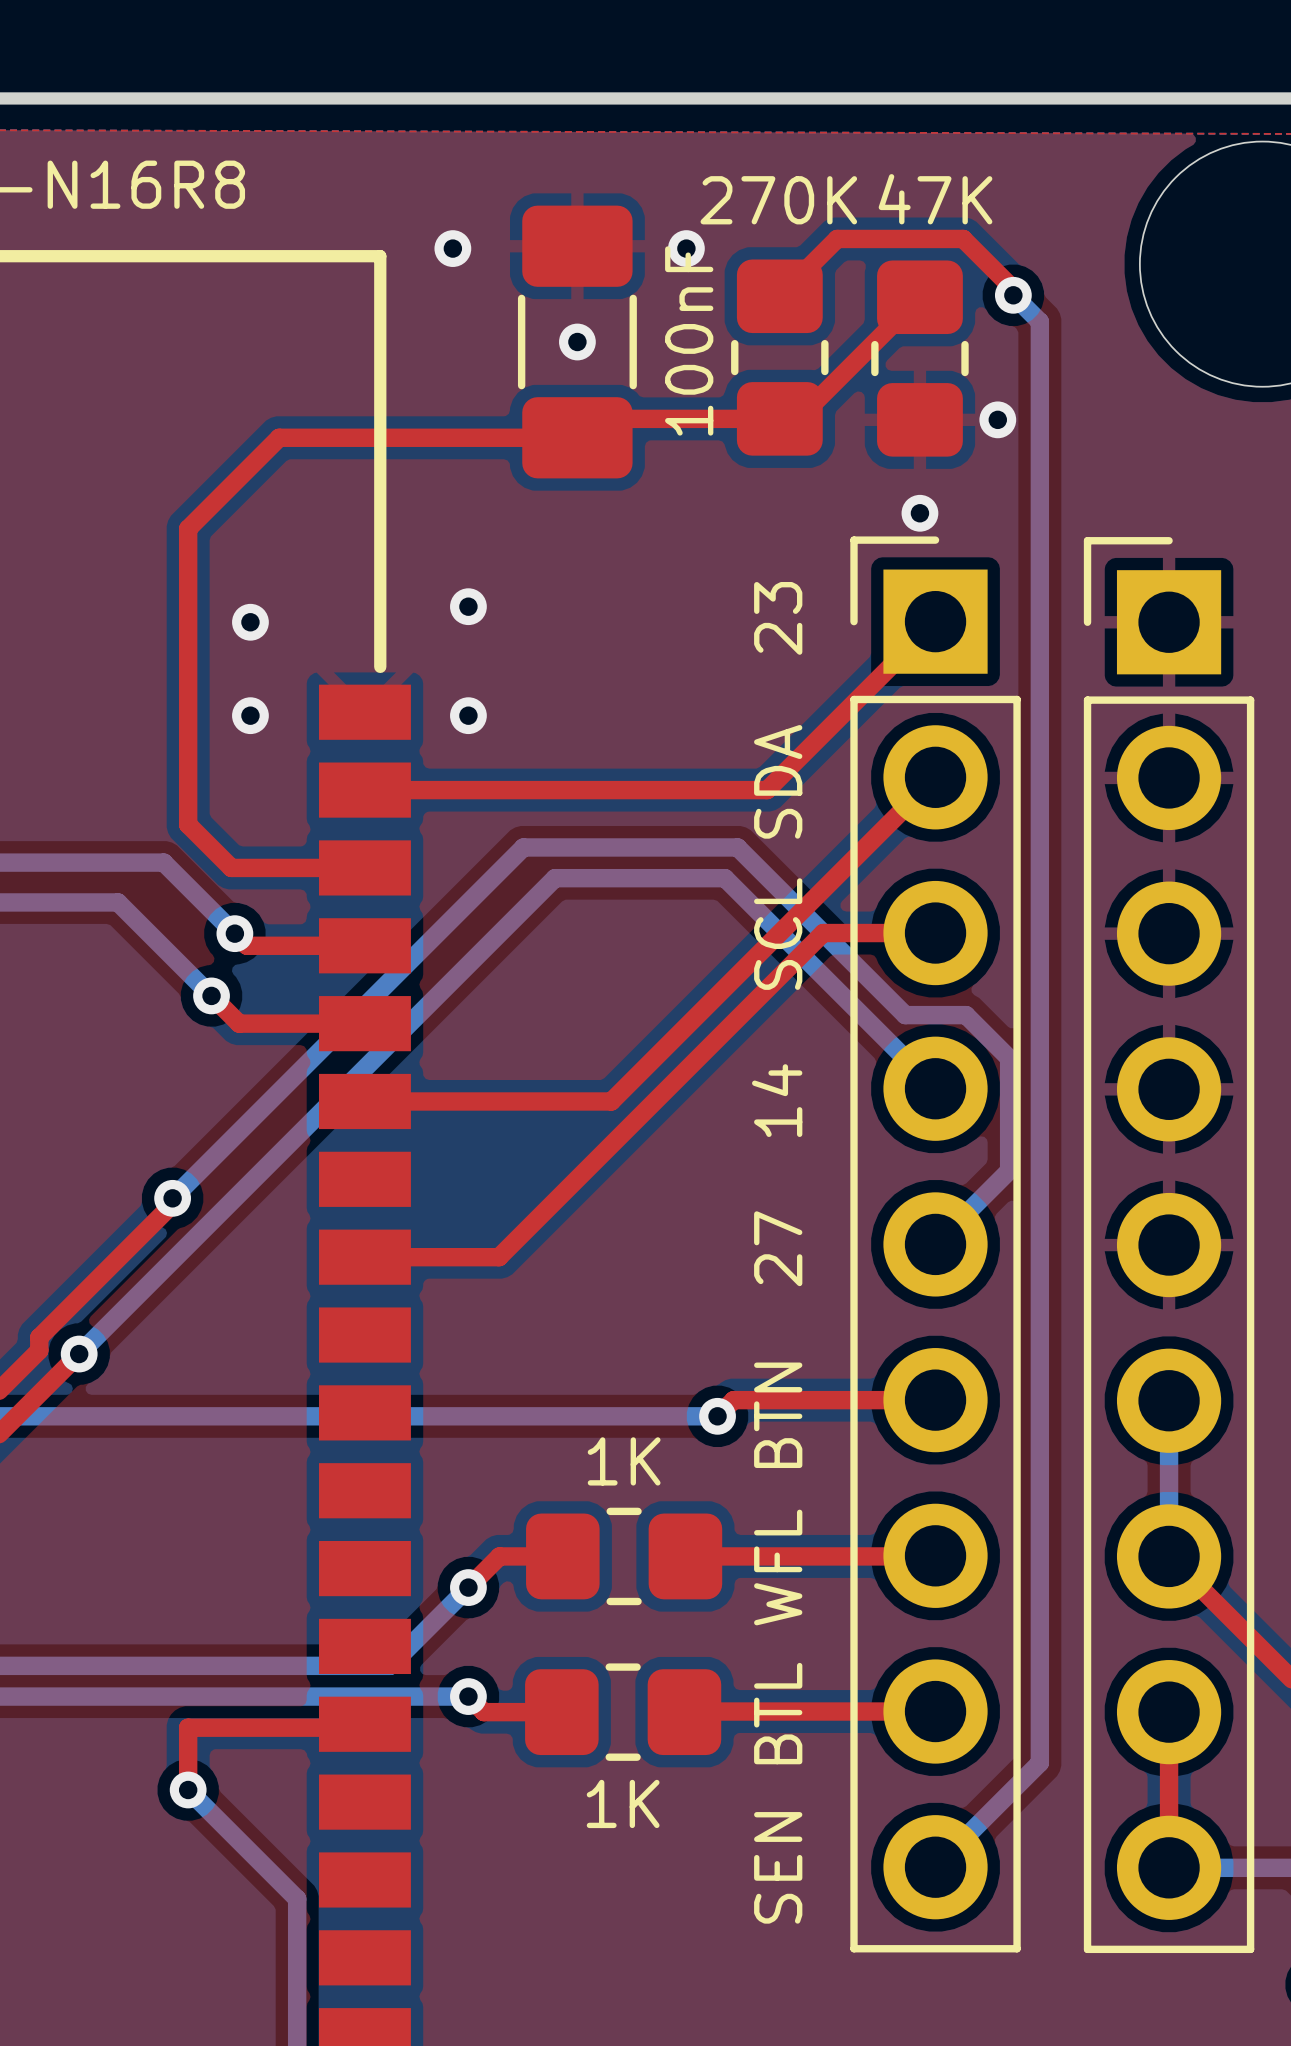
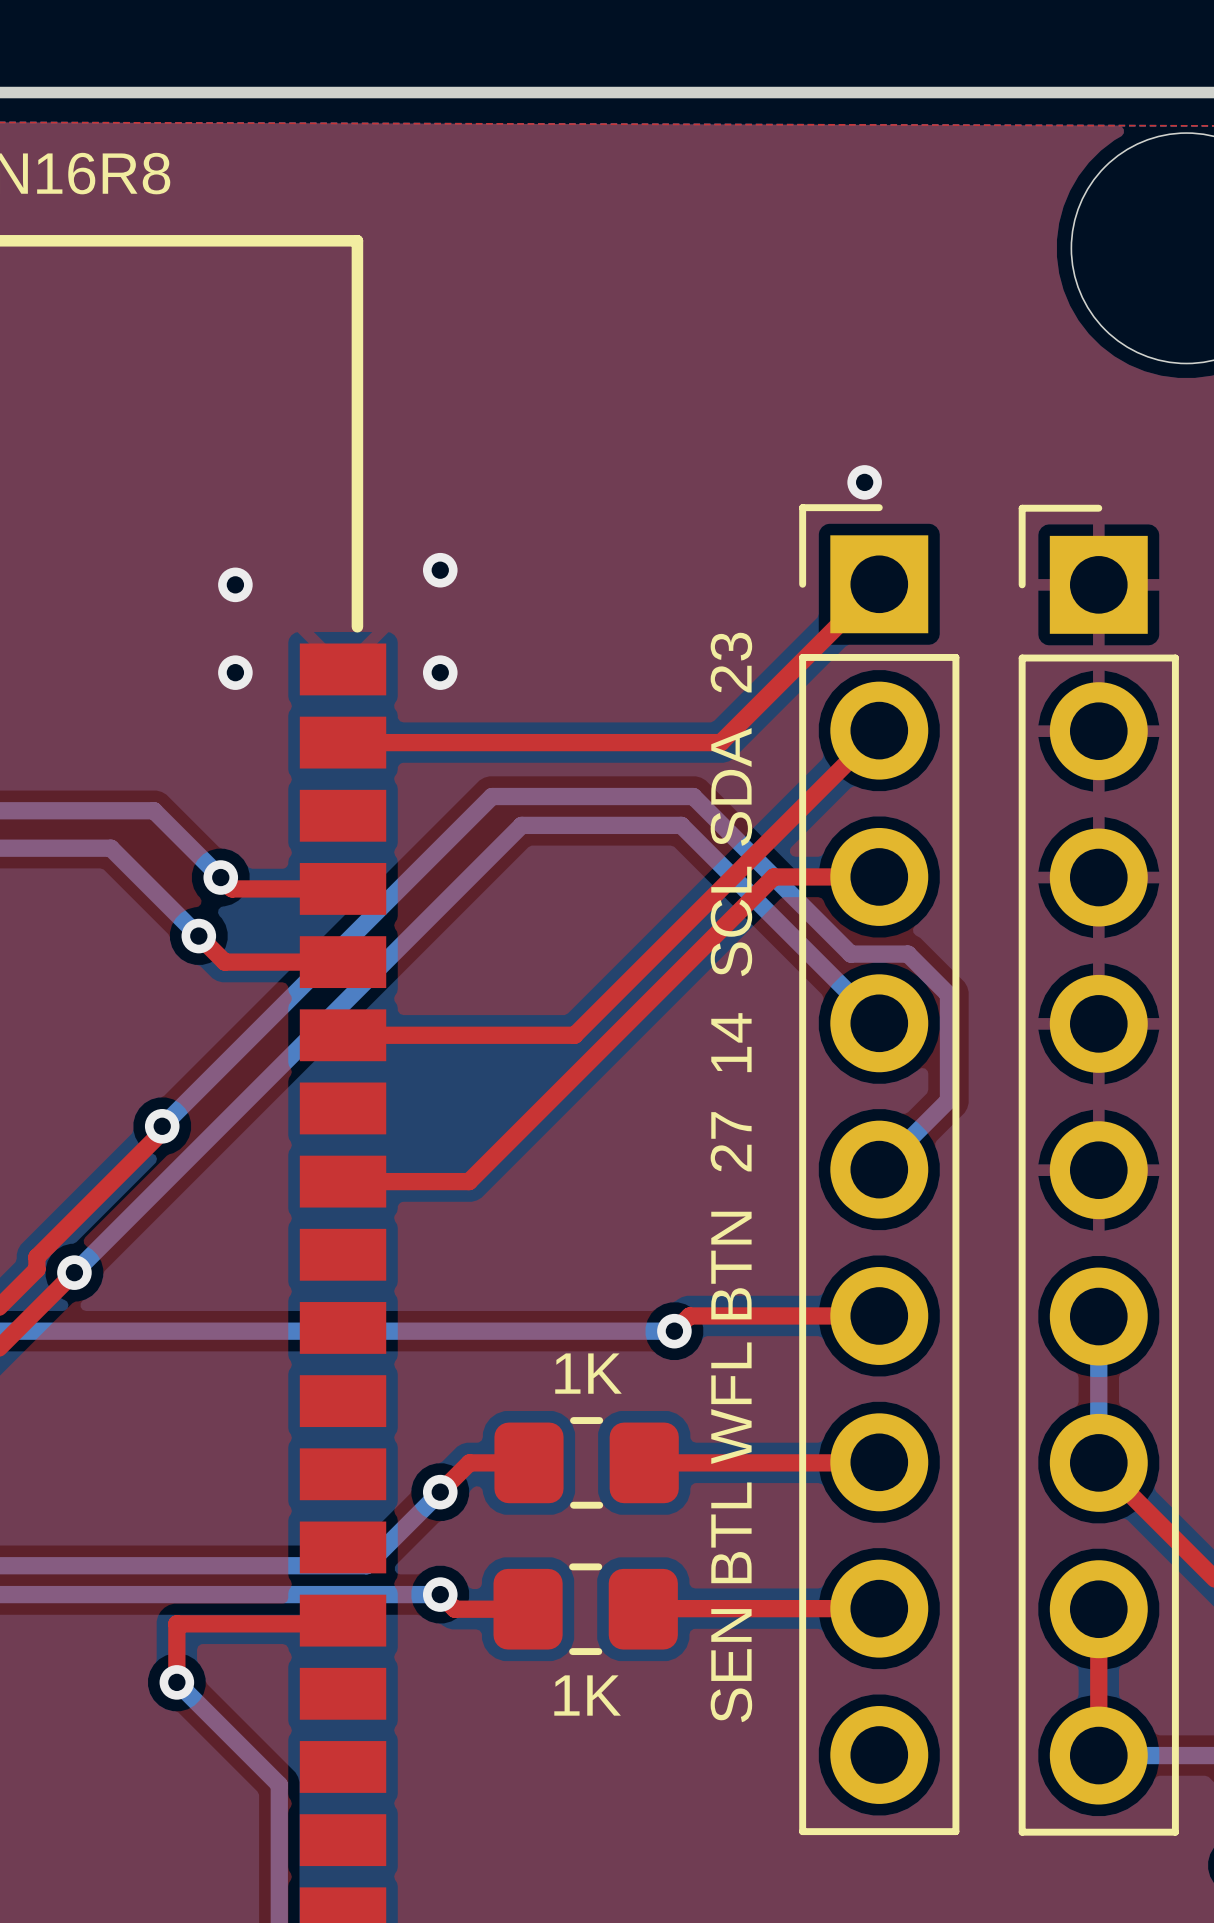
via: (452, 248) -> none
via: (686, 248) -> none
bottom track: (1013, 295) (1039, 321) (1039, 1762) (935, 1867) -> none
via: (1013, 295) -> none
top track: (779, 296) (837, 238) (963, 238) (1013, 289) (1012, 296) -> none
top track: (919, 297) (798, 418) (596, 418) (577, 437) (279, 437) (188, 528) (188, 824) (231, 867) (364, 867) -> none
part: 100nF (577, 342) -> none
via: (577, 342) -> none
part: 270K (779, 357) -> none
part: 47K (919, 358) -> none
via: (997, 419) -> none

